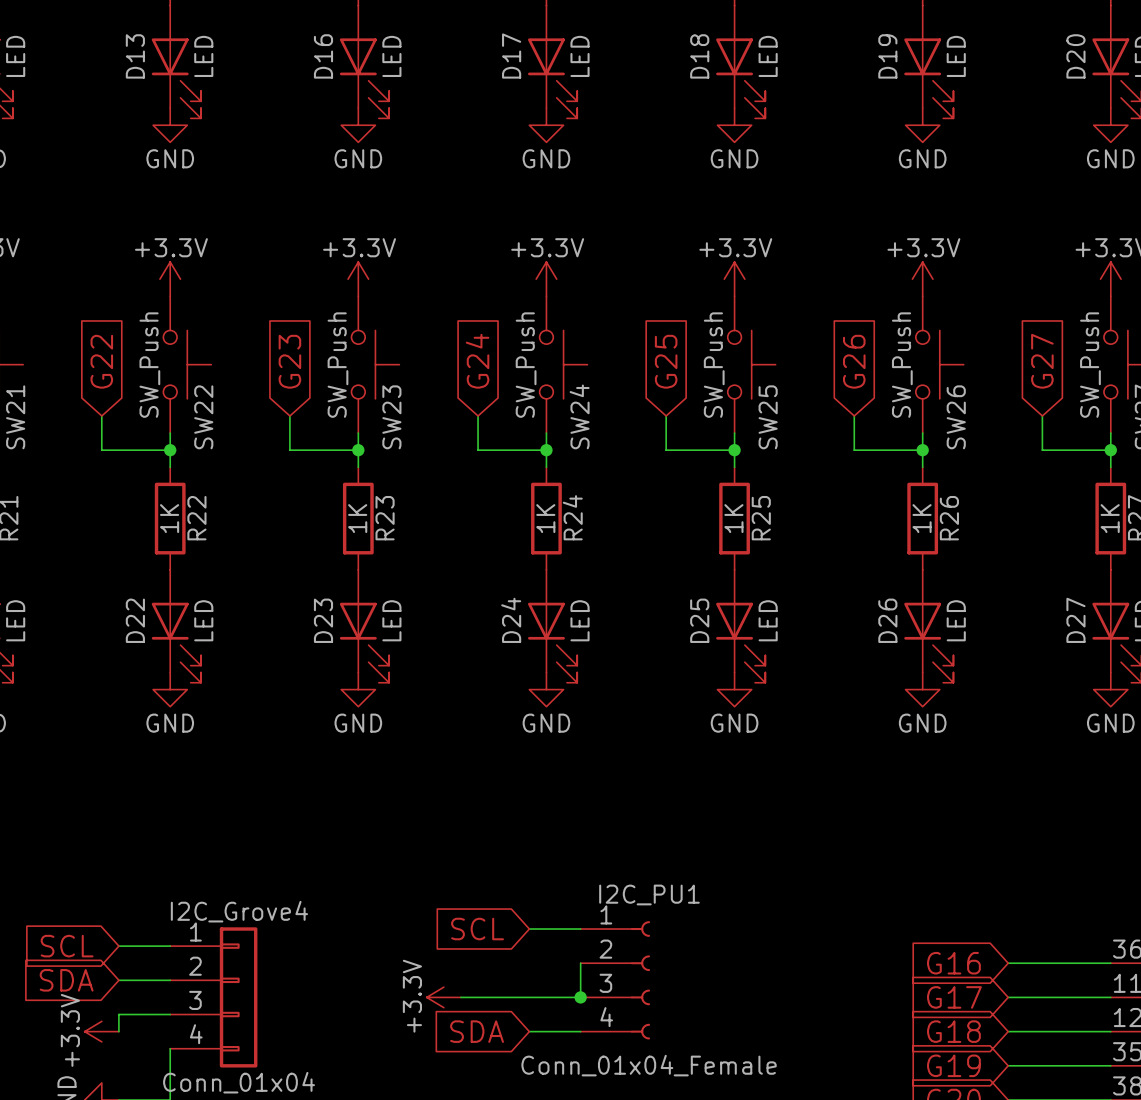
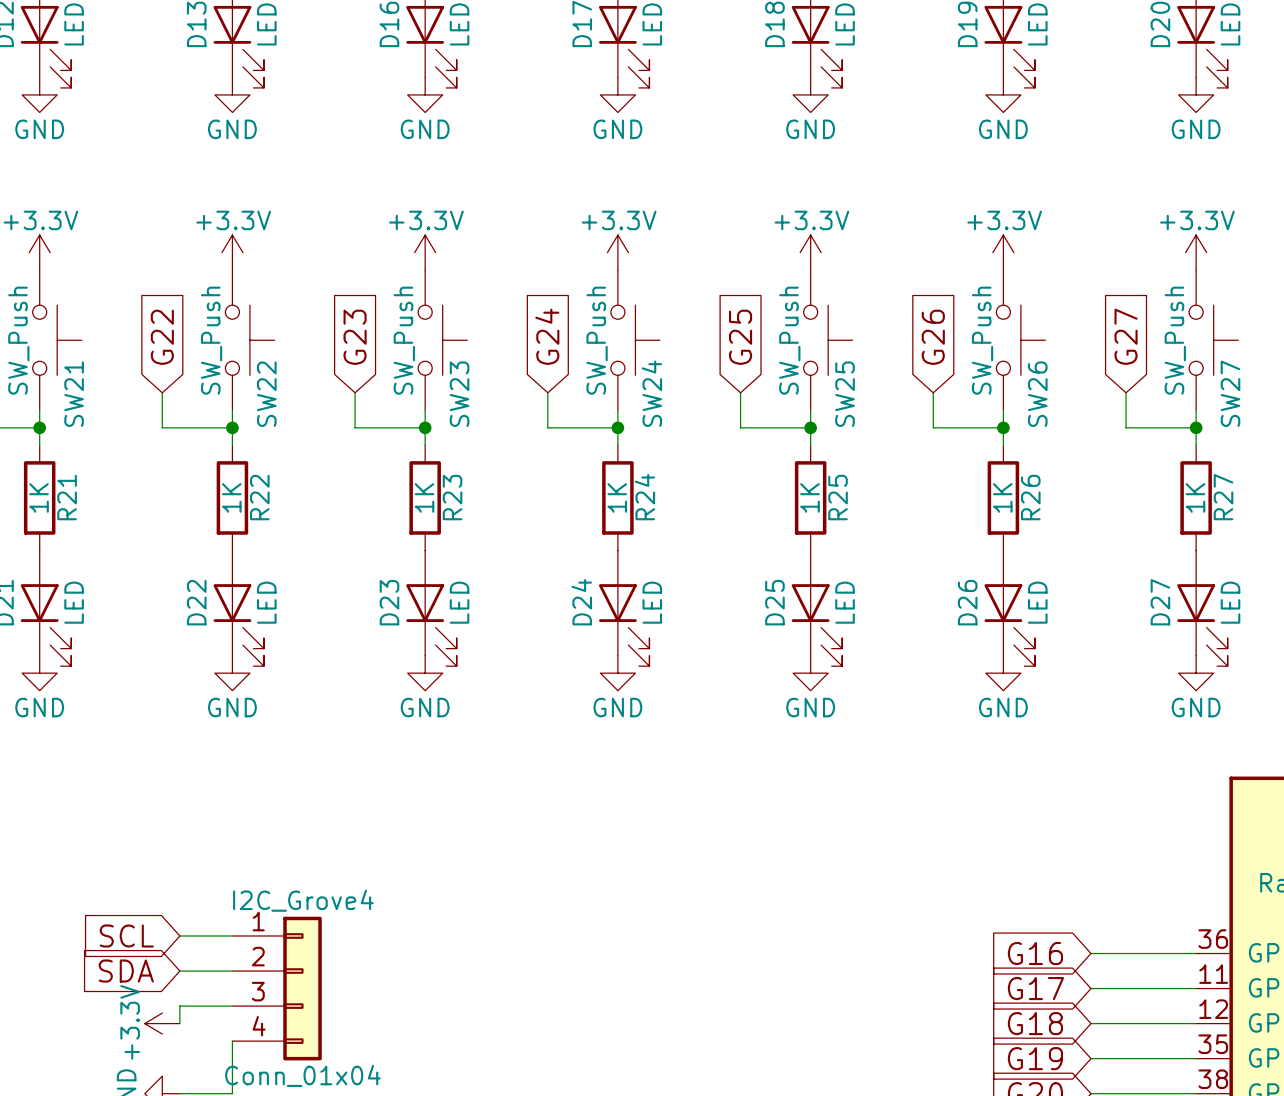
global label: SCL (477, 929) -> none
wire: (529, 929) (580, 929) -> none
wire: (580, 963) (580, 997) (460, 997) -> none
I2C_PU1: Conn_01x04_Female (615, 980) -> none
power symbol: +3.3V (443, 997) -> none
junction: (580, 997) -> none
global label: SDA (477, 1031) -> none
wire: (529, 1031) (580, 1031) -> none

